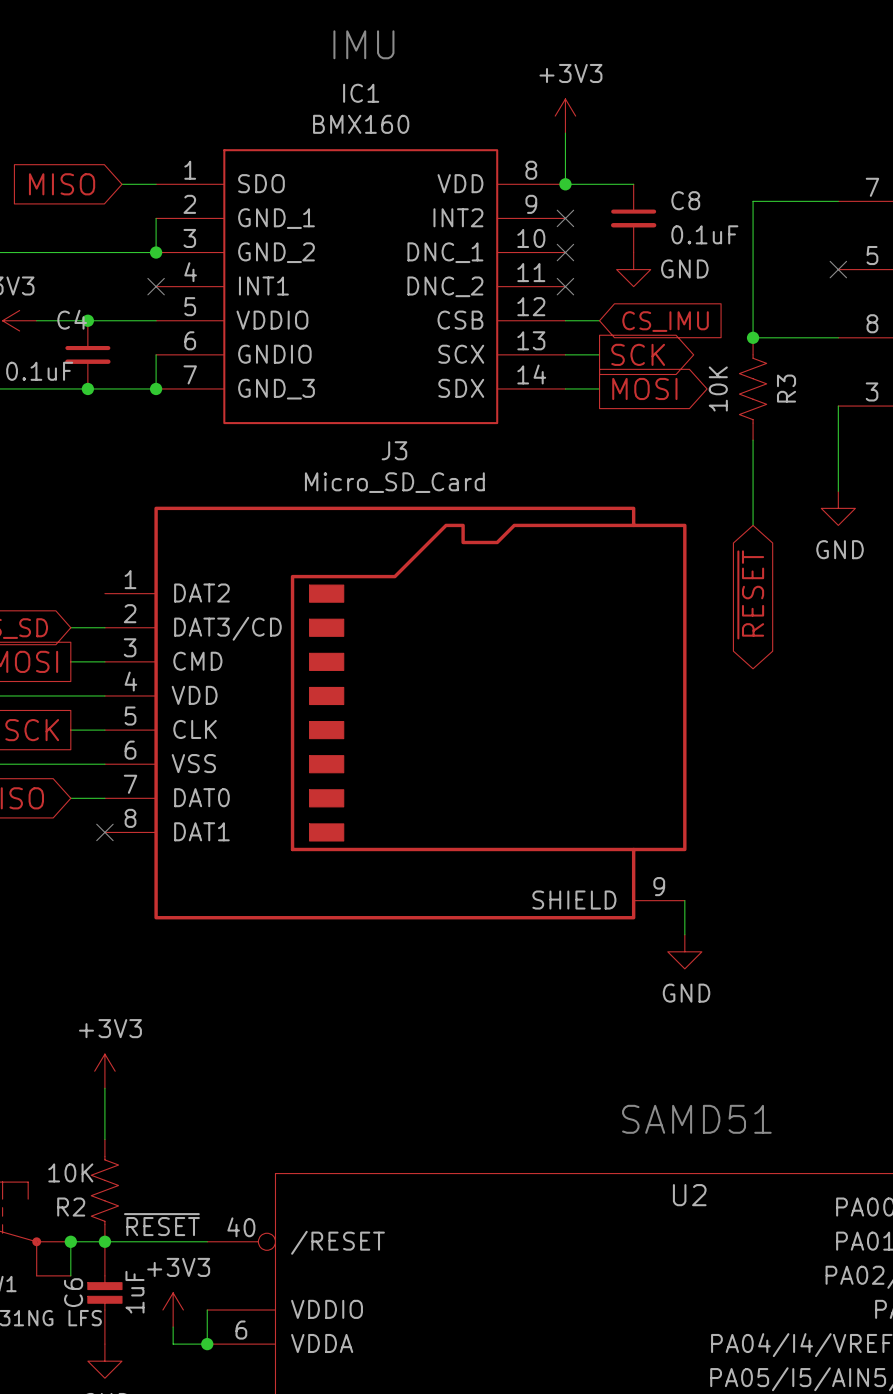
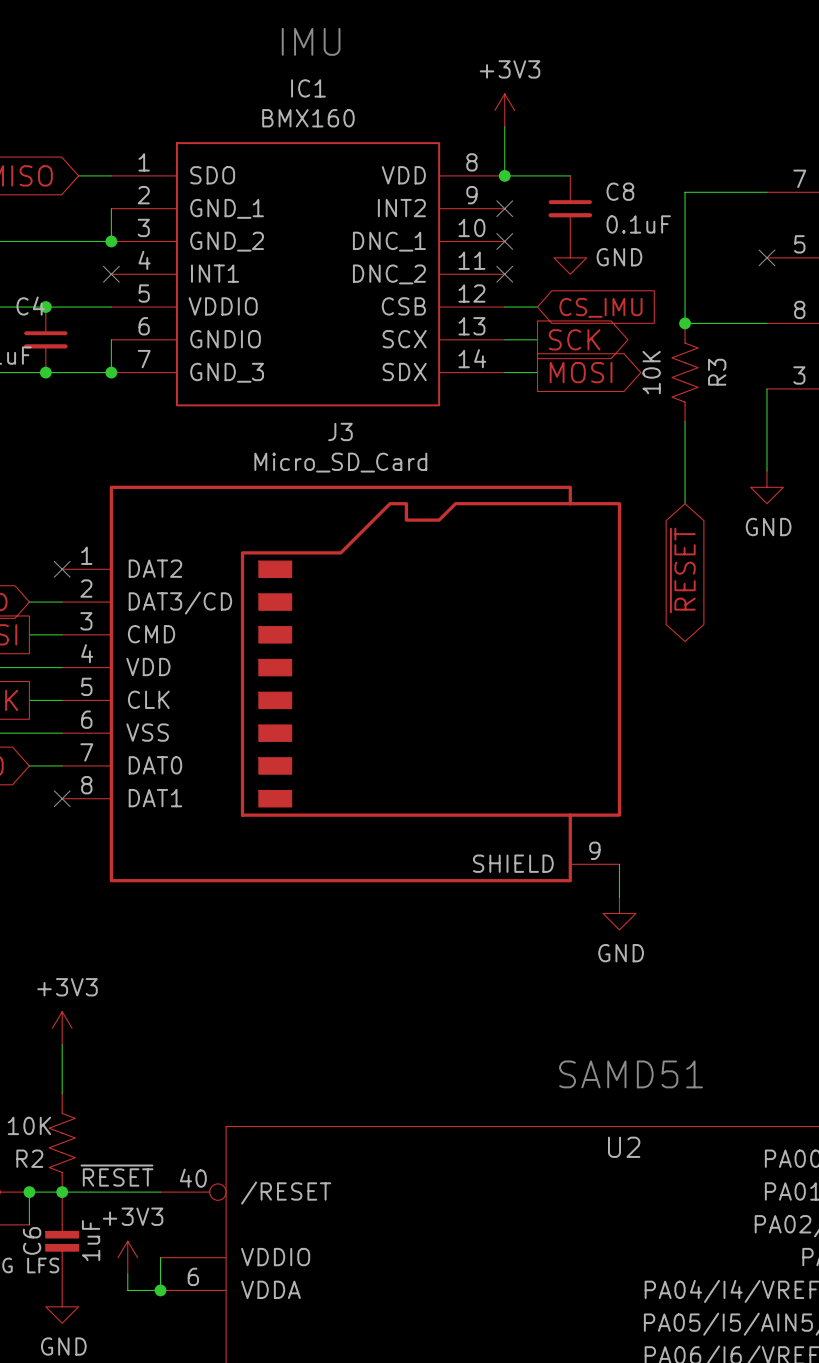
no-connect mark: none -> (62, 569)

